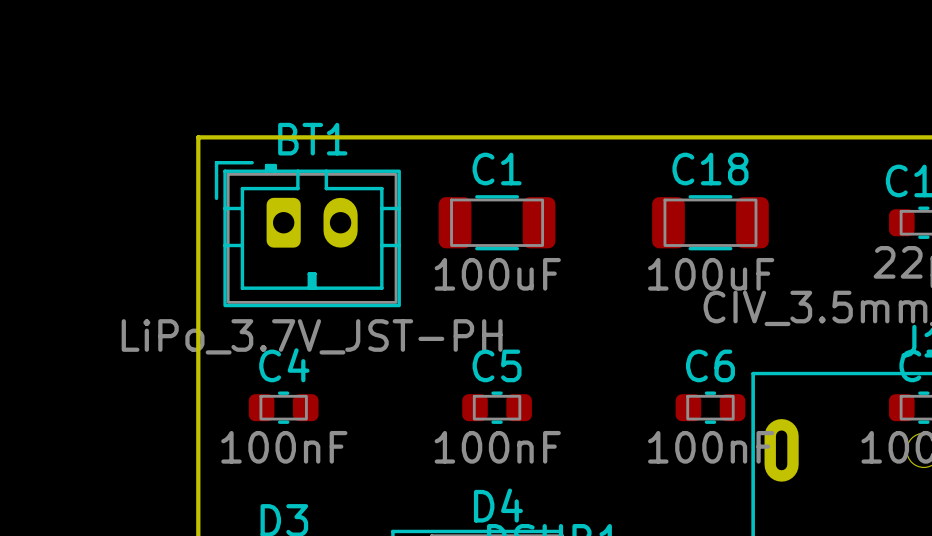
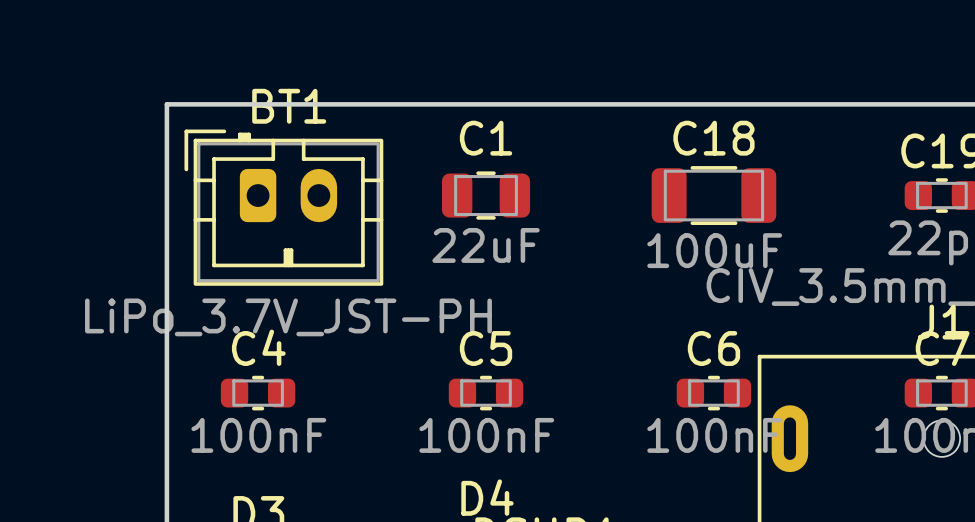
C1 footprint: [438, 195, 556, 251] -> [441, 171, 531, 220]
C1 value: 100uF (497, 274) -> 22uF (486, 245)

